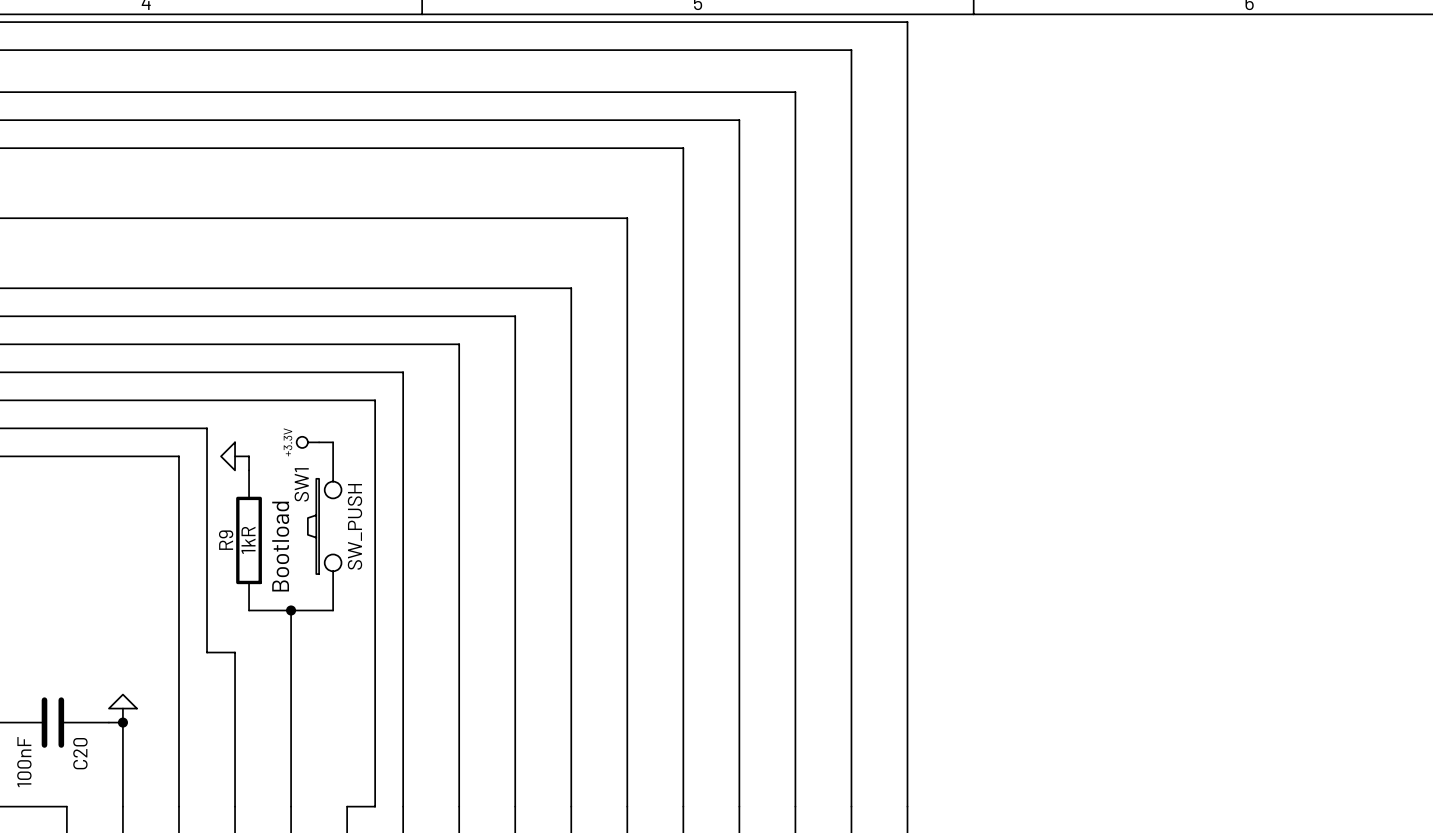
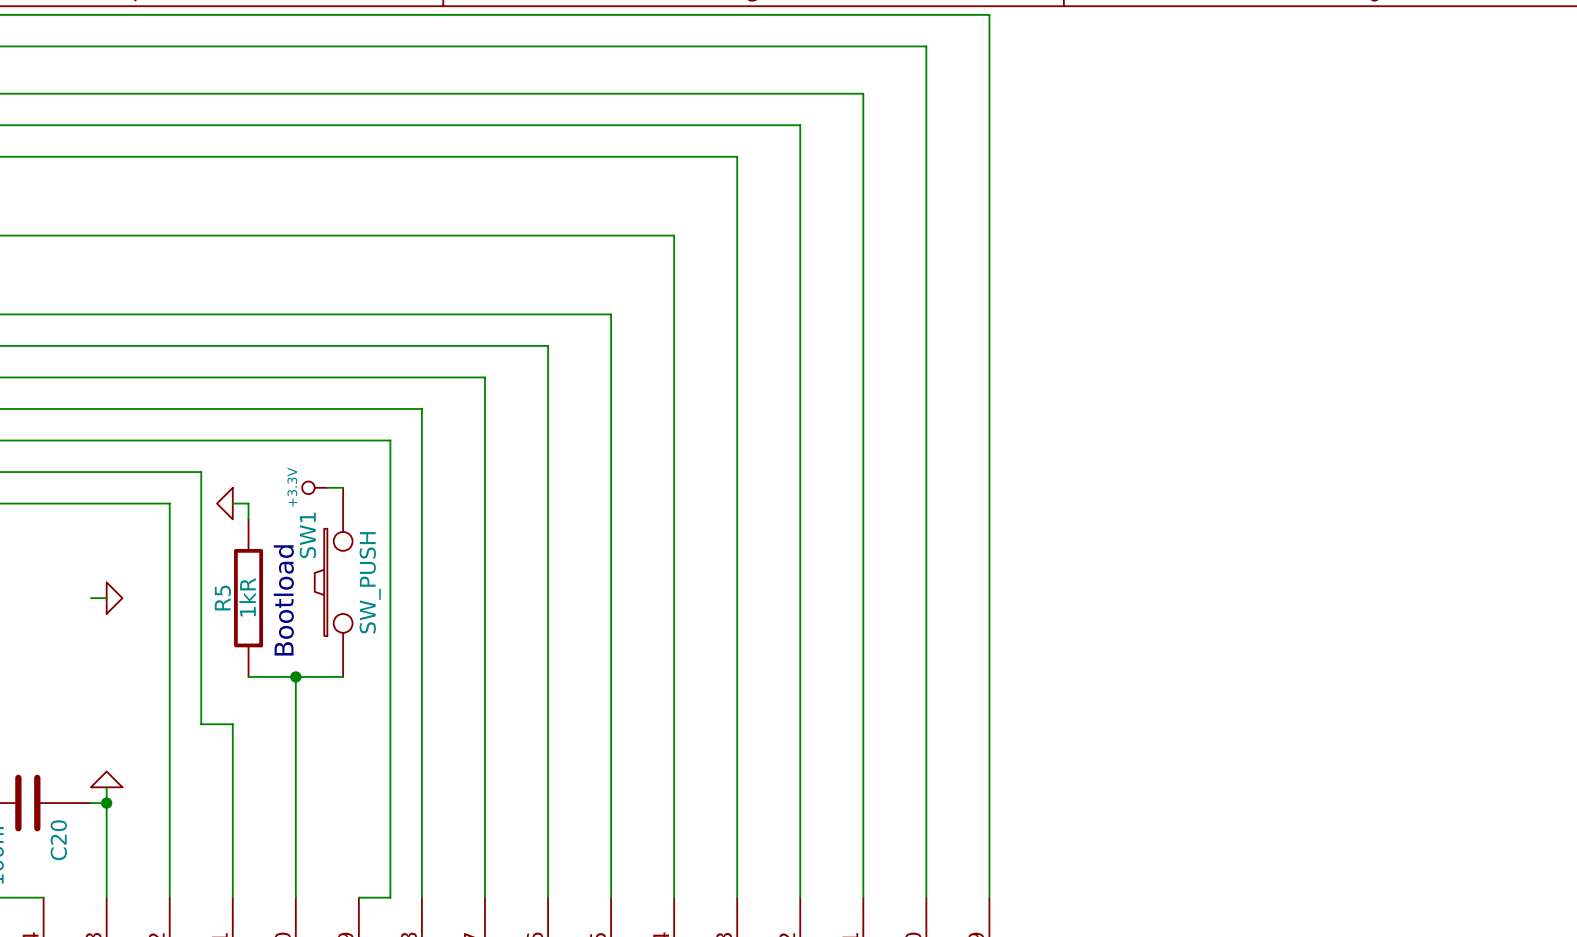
wire: none -> (90, 598) (106, 598)
power symbol: none -> (114, 598)
R9 name: R9 (226, 540) -> R5 (222, 598)

